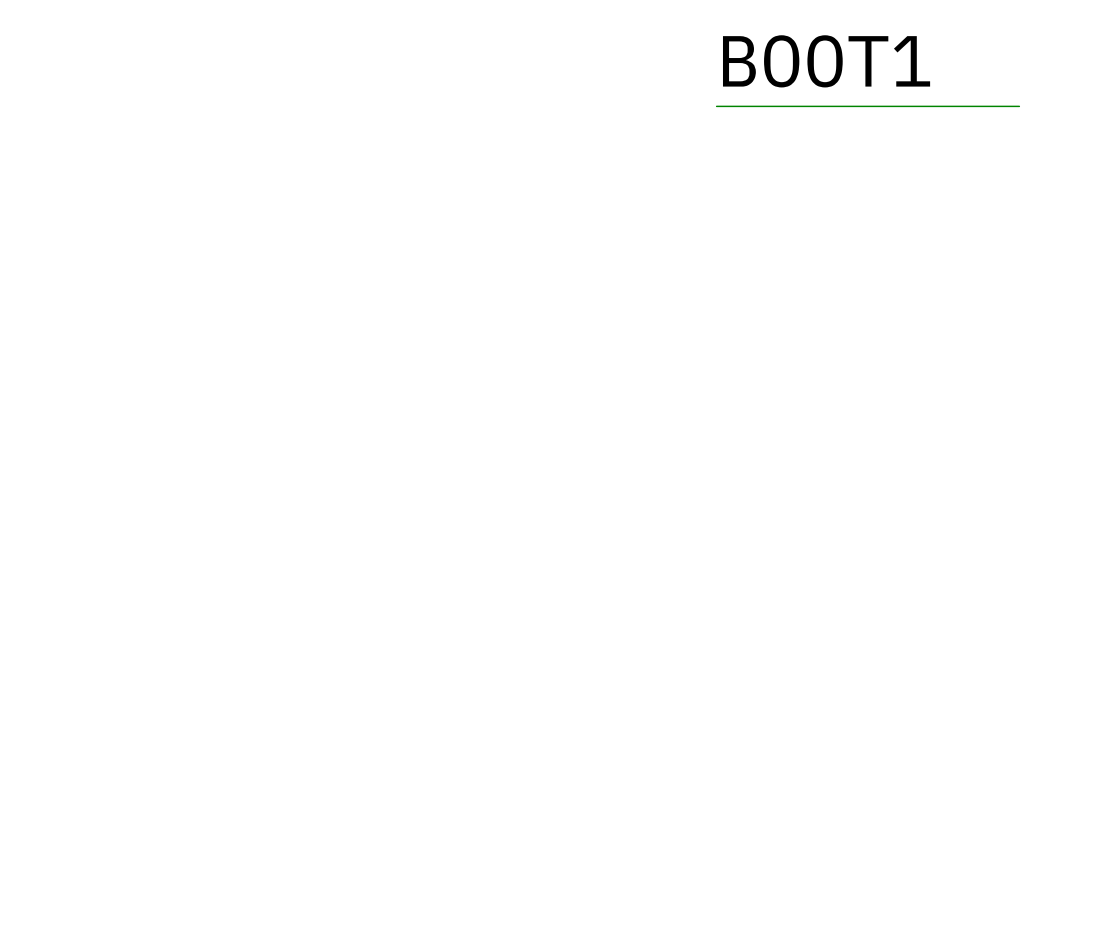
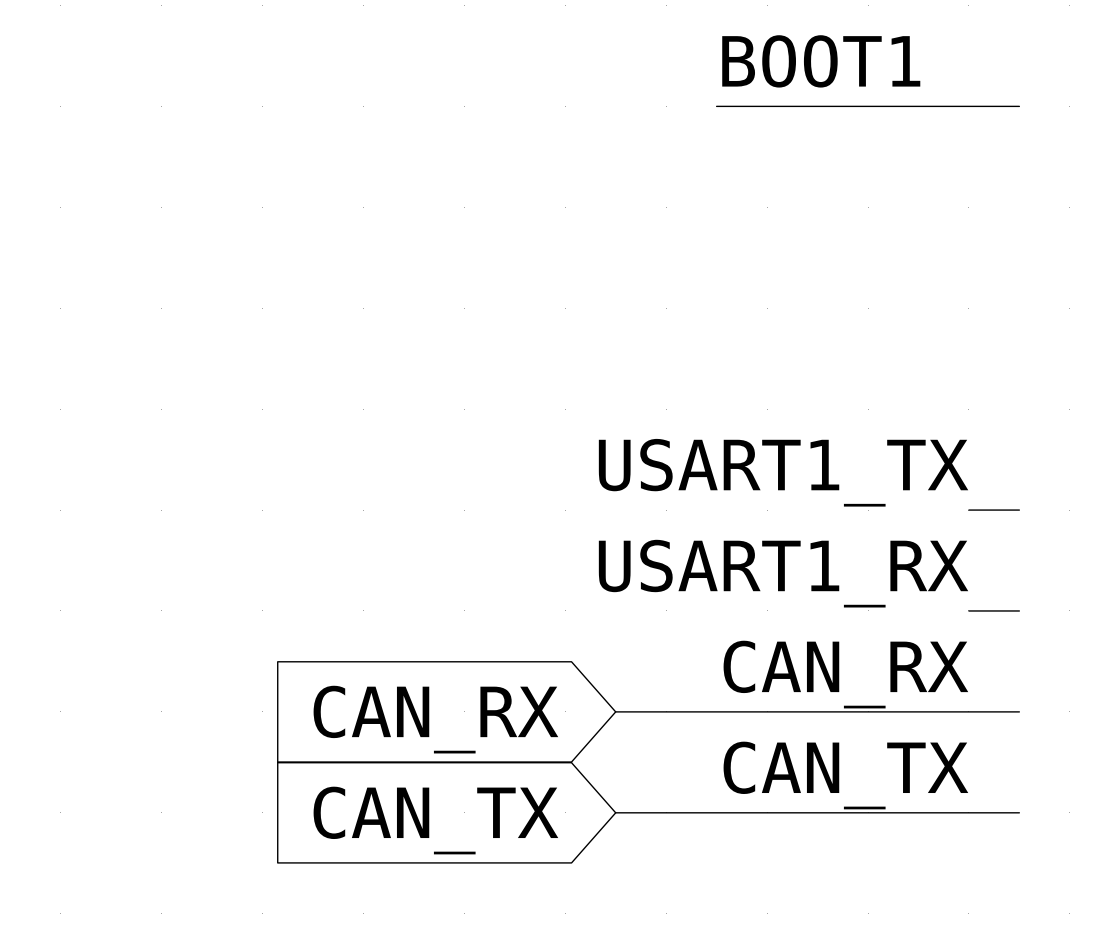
label: none -> USART1_TX (783, 472)
wire: none -> (968, 510) (1019, 510)
label: none -> USART1_RX (783, 573)
wire: none -> (968, 610) (1019, 610)
label: none -> CAN_RX (845, 674)
wire: none -> (615, 711) (1019, 711)
global label: none -> CAN_RX (435, 719)
label: none -> CAN_TX (845, 775)
wire: none -> (615, 812) (1019, 812)
global label: none -> CAN_TX (435, 820)

